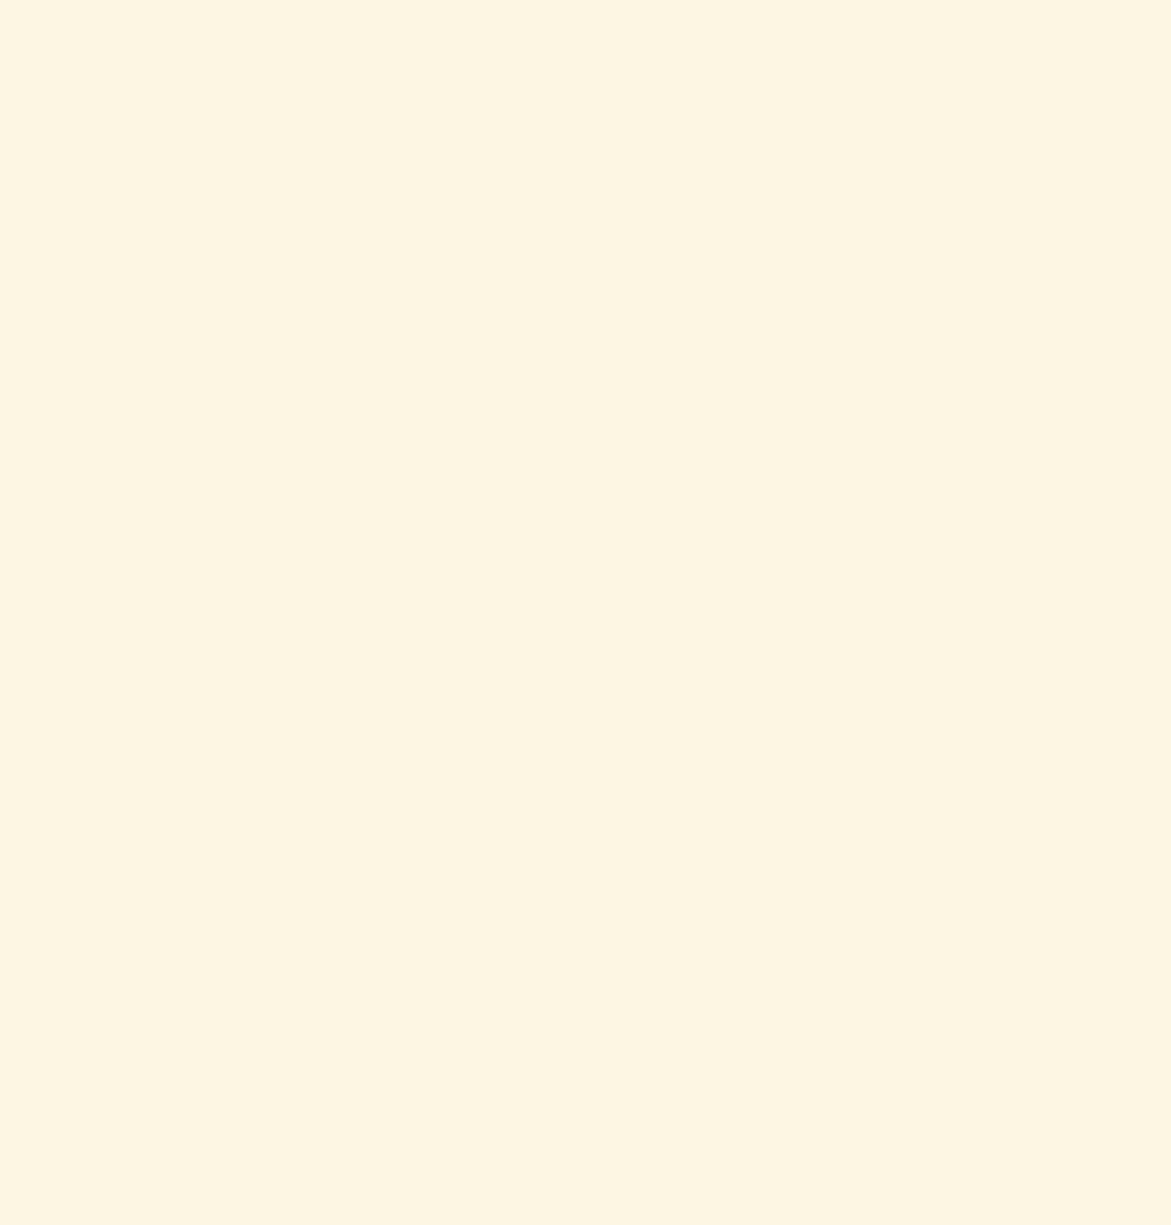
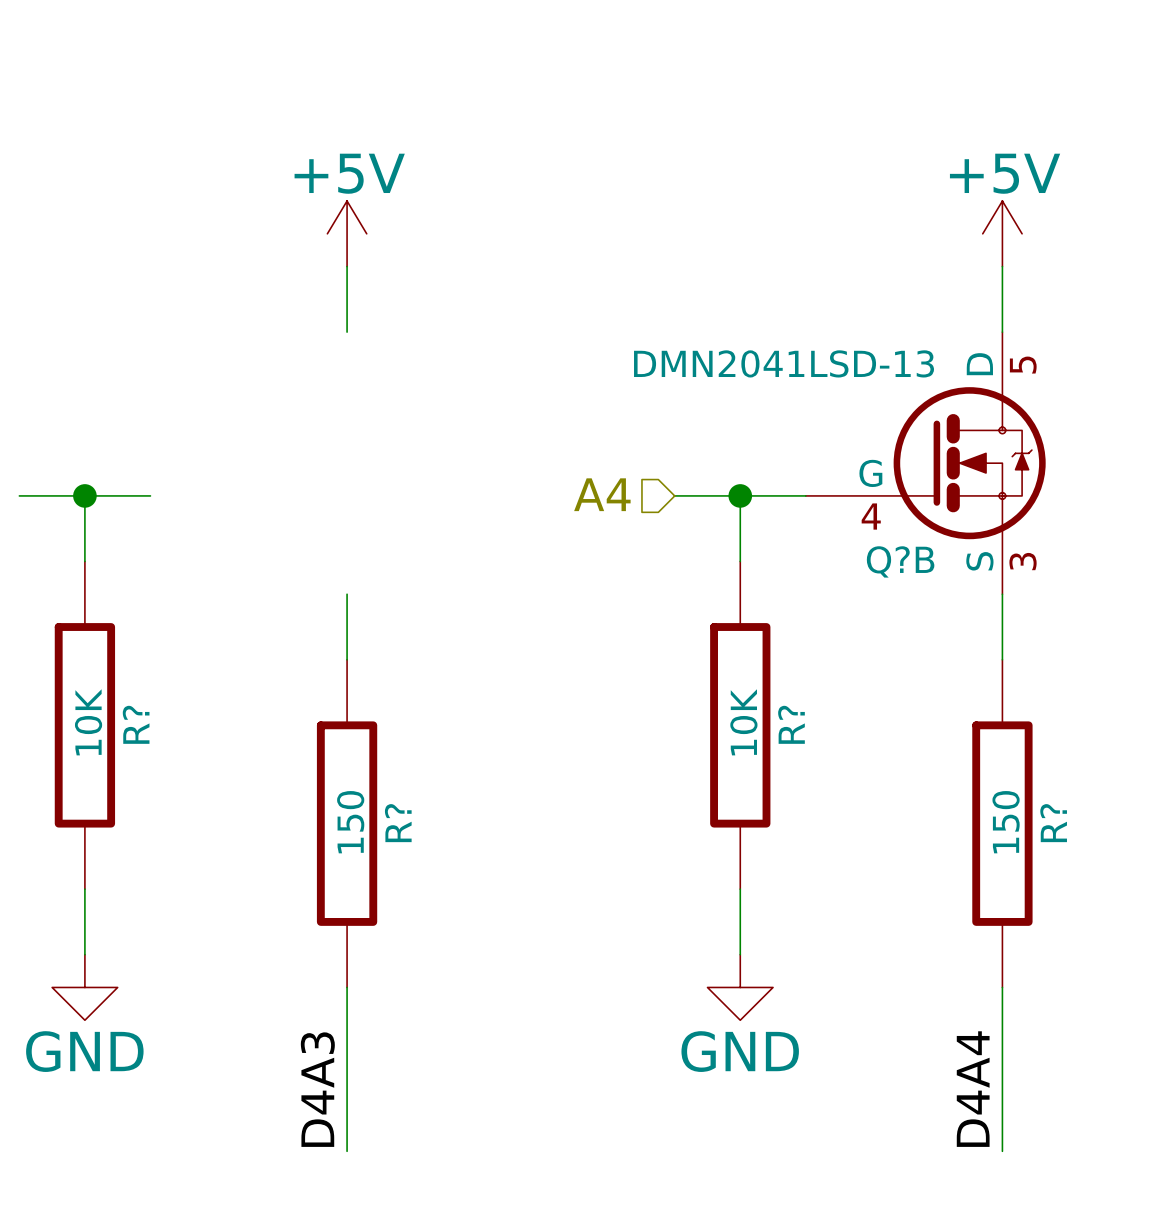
power symbol: none -> +5V (347, 233)
power symbol: none -> +5V (1002, 233)
wire: none -> (347, 266) (347, 332)
wire: none -> (1002, 266) (1002, 332)
Q?B: none -> DMN2041LSD-13 (925, 463)
hierarchical label: none -> A4 (602, 494)
wire: none -> (19, 495) (150, 495)
wire: none -> (84, 495) (84, 561)
junction: none -> (84, 495)
wire: none -> (674, 495) (805, 495)
wire: none -> (740, 495) (740, 561)
junction: none -> (740, 495)
wire: none -> (347, 594) (347, 659)
wire: none -> (1002, 594) (1002, 659)
R?: none -> 10K (84, 725)
R?: none -> 10K (740, 725)
R?: none -> 150 (347, 823)
R?: none -> 150 (1002, 823)
wire: none -> (84, 889) (84, 954)
wire: none -> (740, 889) (740, 954)
power symbol: none -> GND (84, 987)
wire: none -> (347, 987) (347, 1151)
power symbol: none -> GND (740, 987)
wire: none -> (1002, 987) (1002, 1151)
label: none -> D4A4 (973, 1089)
label: none -> D4A3 (317, 1089)

